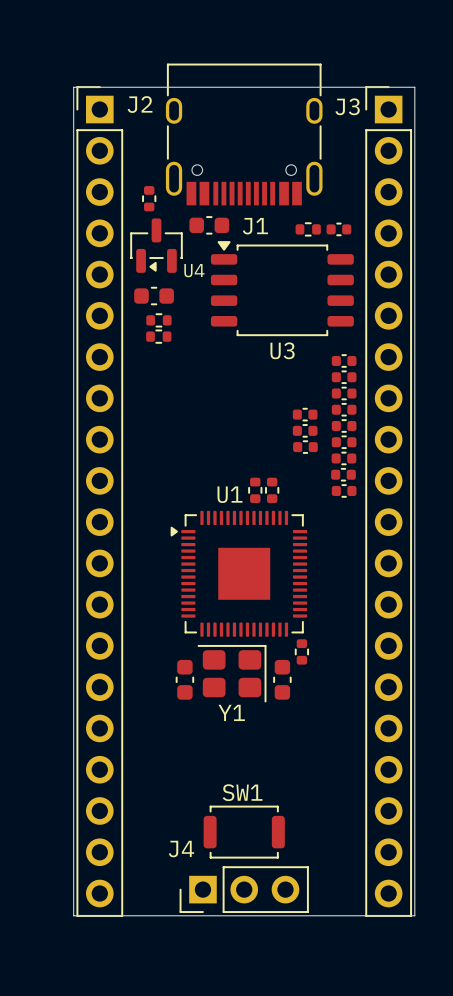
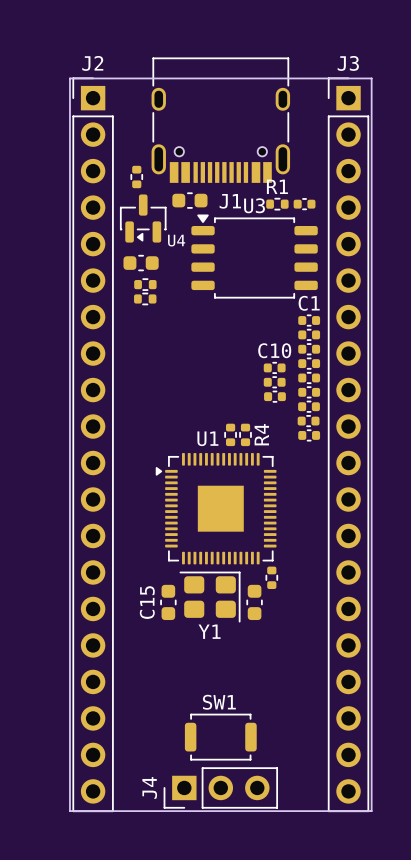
J2 name position: J2 (140, 104) -> J2 (92, 63)
J3 name position: J3 (347, 106) -> J3 (348, 63)
R1 name: none -> R1 (277, 186)
C1 name: none -> C1 (309, 303)
U3 name position: U3 (282, 350) -> U3 (254, 205)
C10 name: none -> C10 (274, 350)
R4 name: none -> R4 (261, 434)
C15 name: none -> C15 (147, 602)
J4 name rotation: 0° (181, 849) -> 90° counterclockwise (149, 787)
J4 name position: J4 (181, 849) -> J4 (149, 787)

